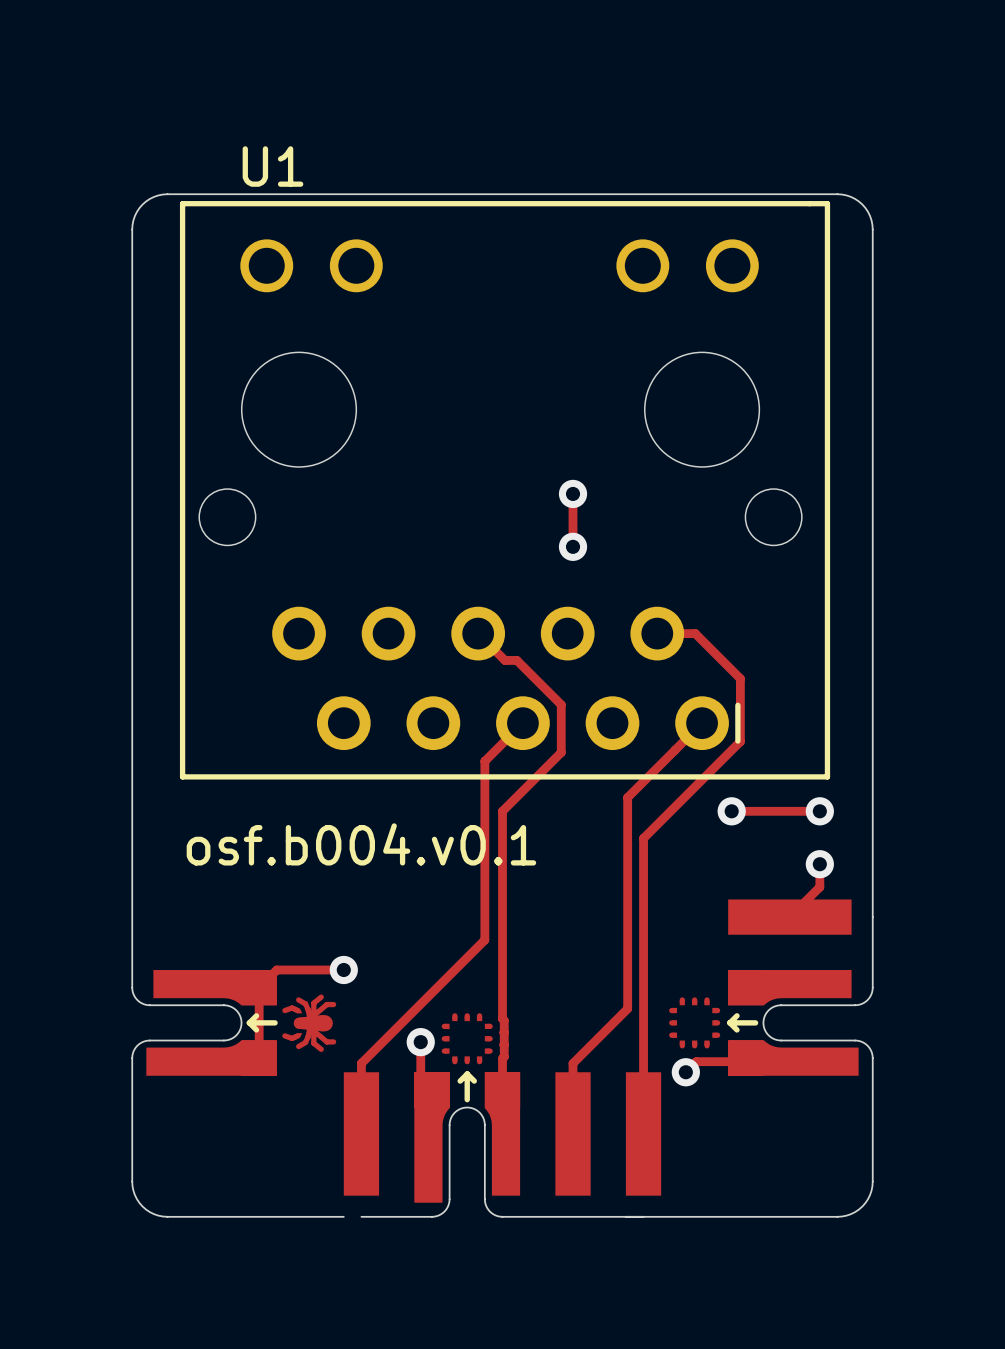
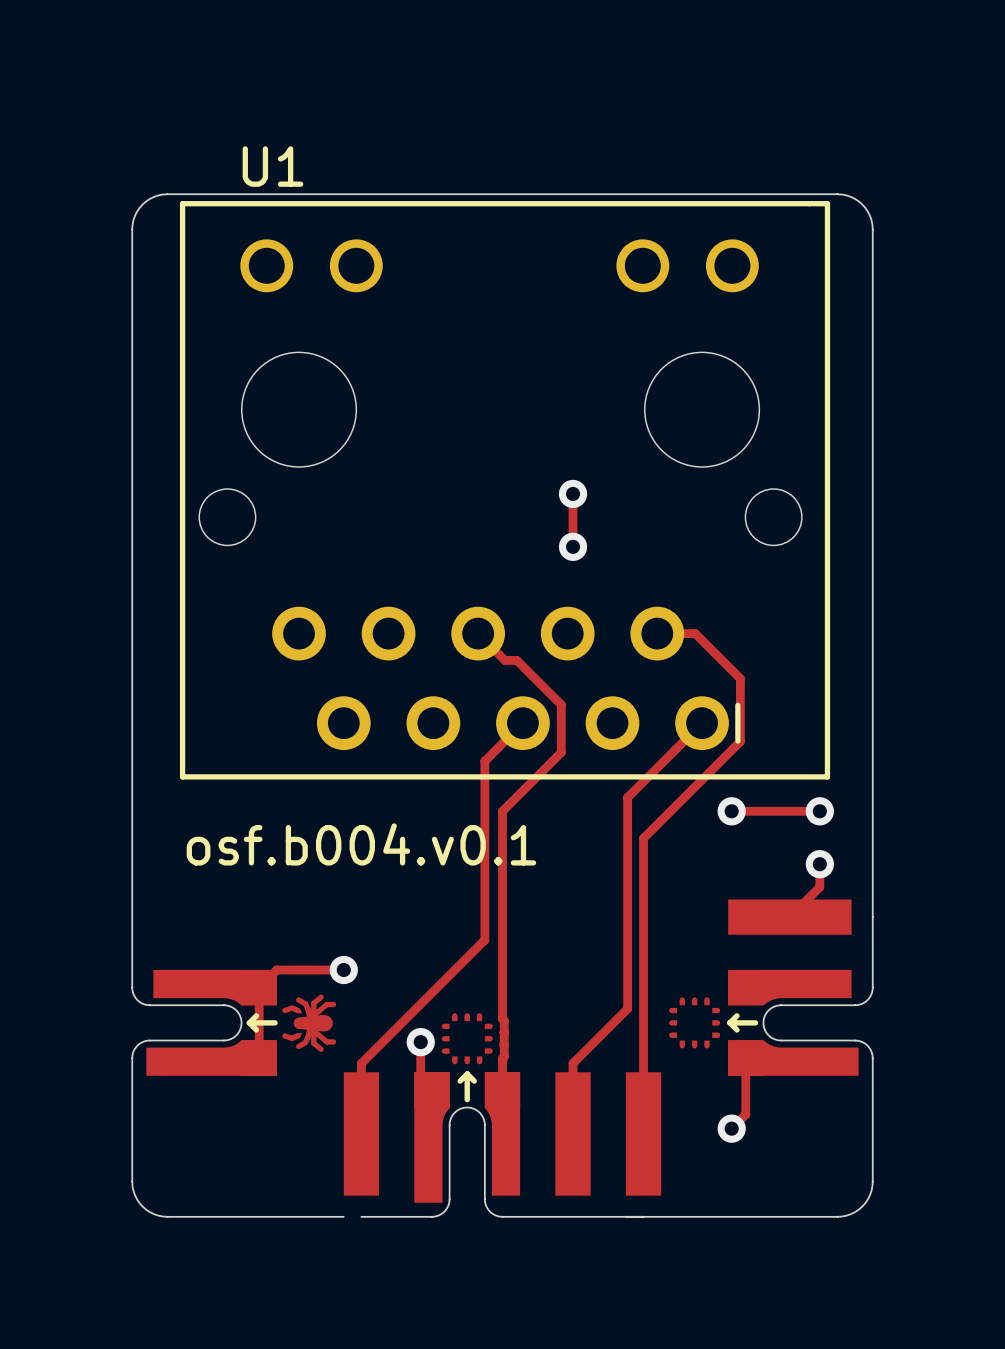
track: (745, 1058) (742, 1061) (696, 1061) (685, 1072) -> (745, 1058) (745, 1114) (731, 1128)
via position: (685, 1072) -> (731, 1128)

